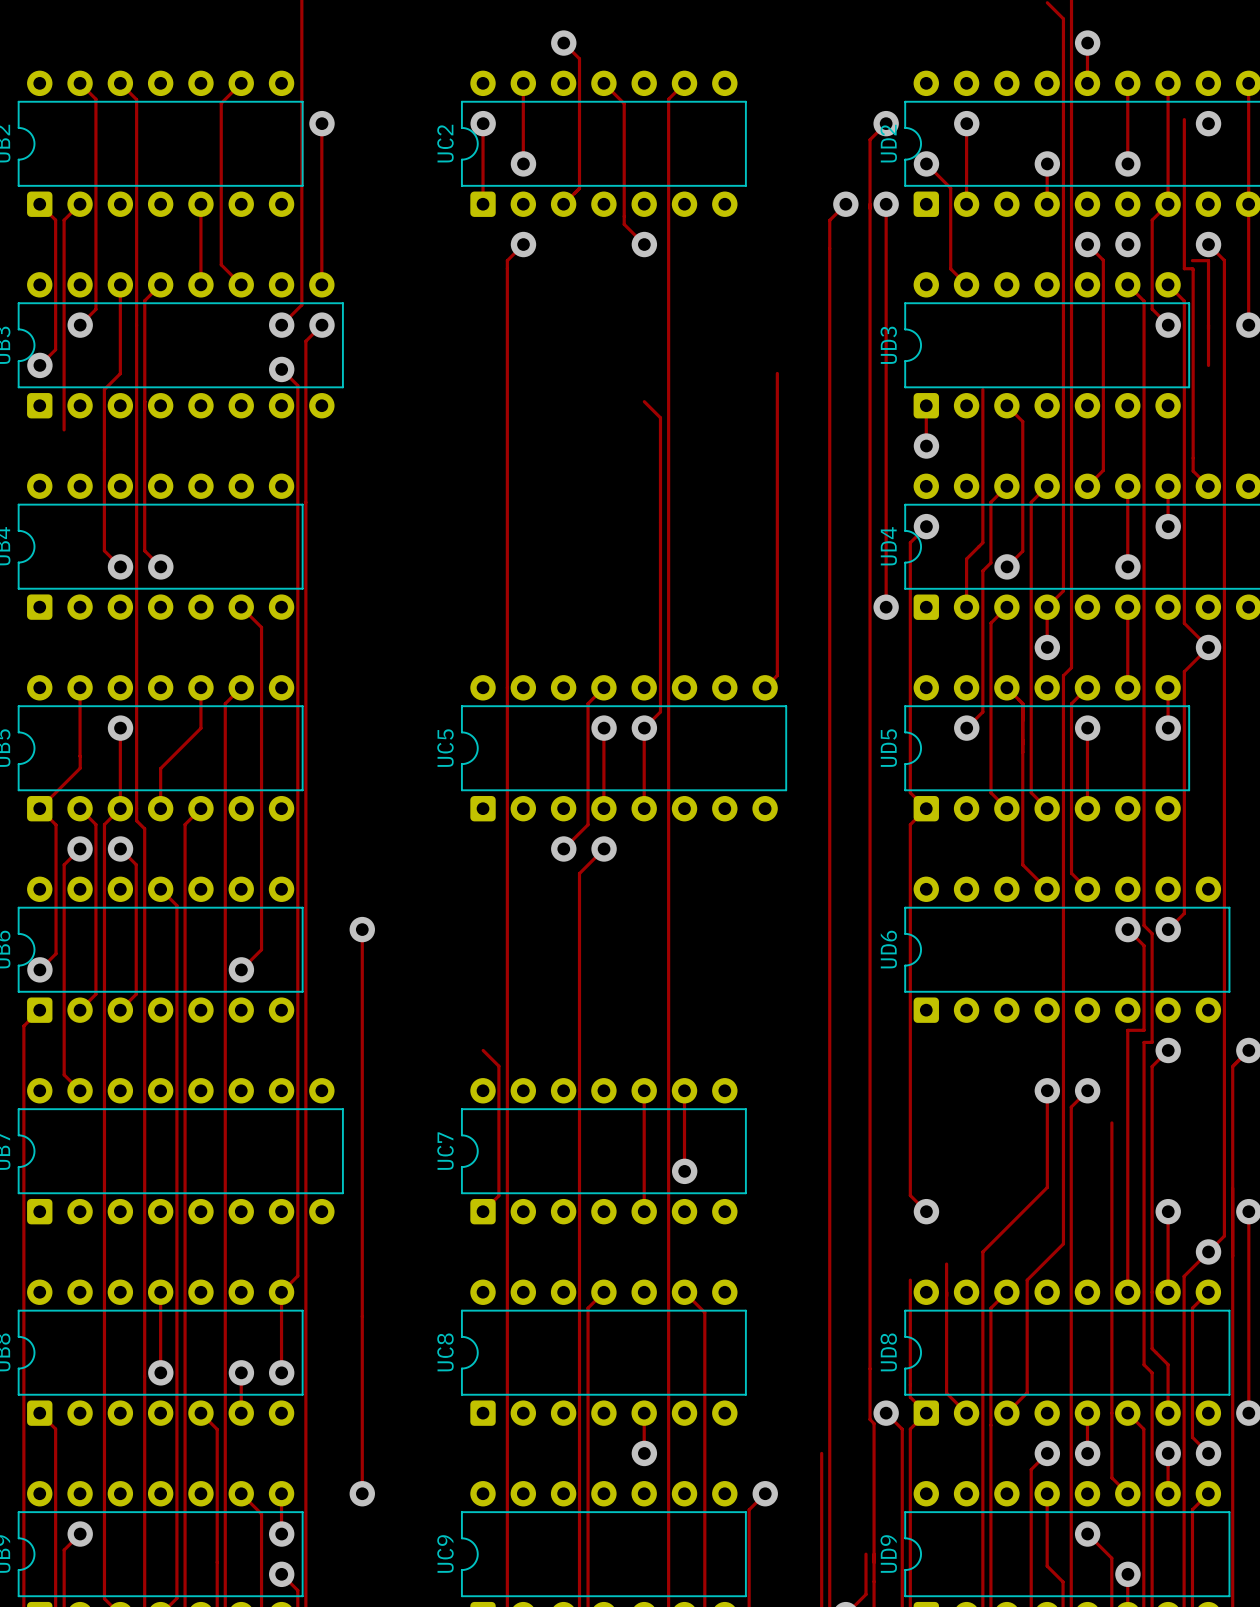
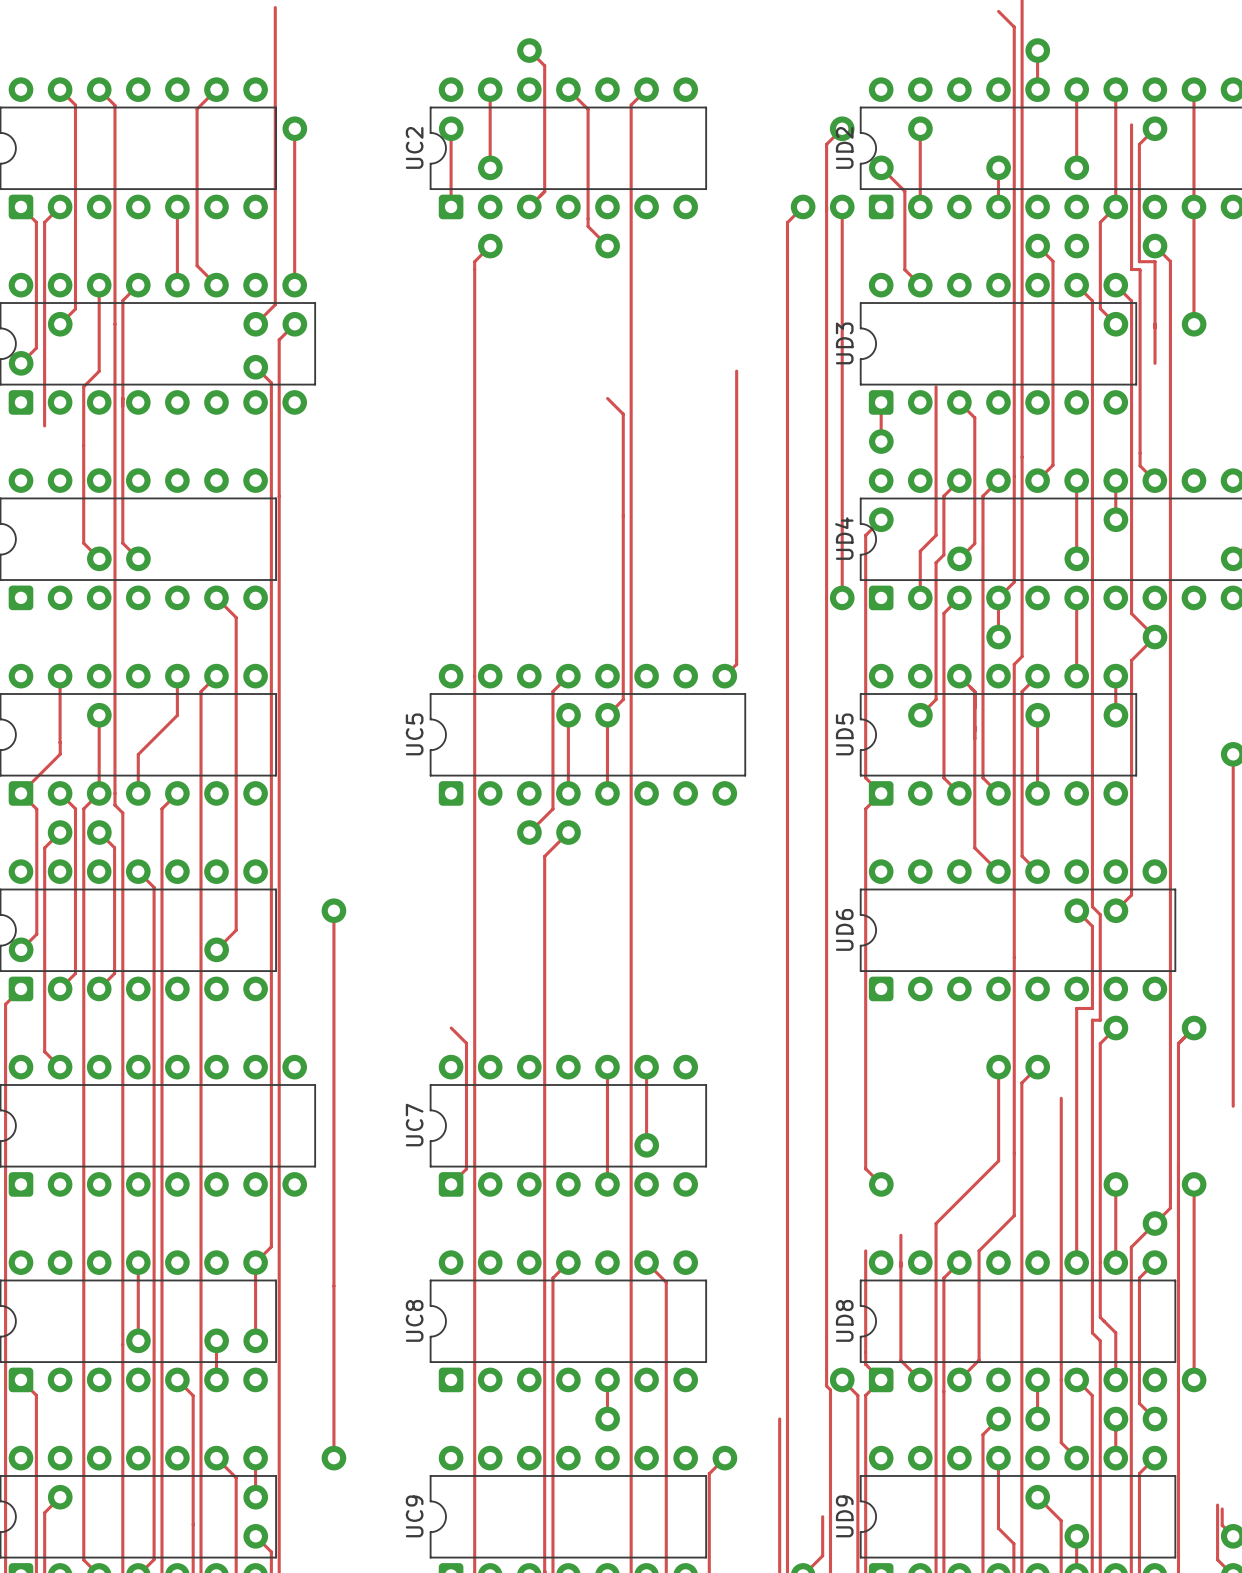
track: none -> (1155, 128) (1139, 144) (1139, 261)

